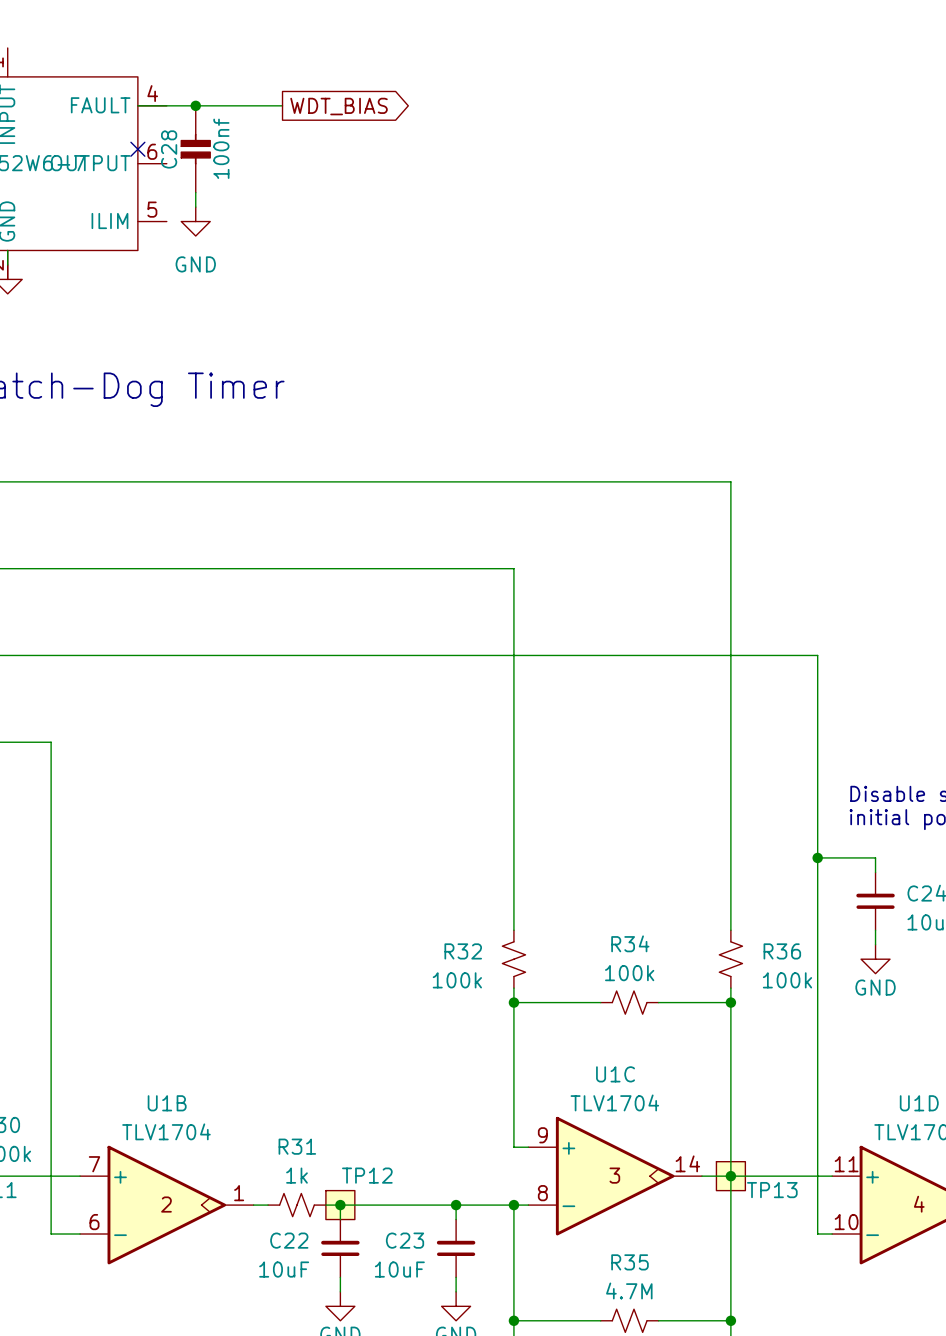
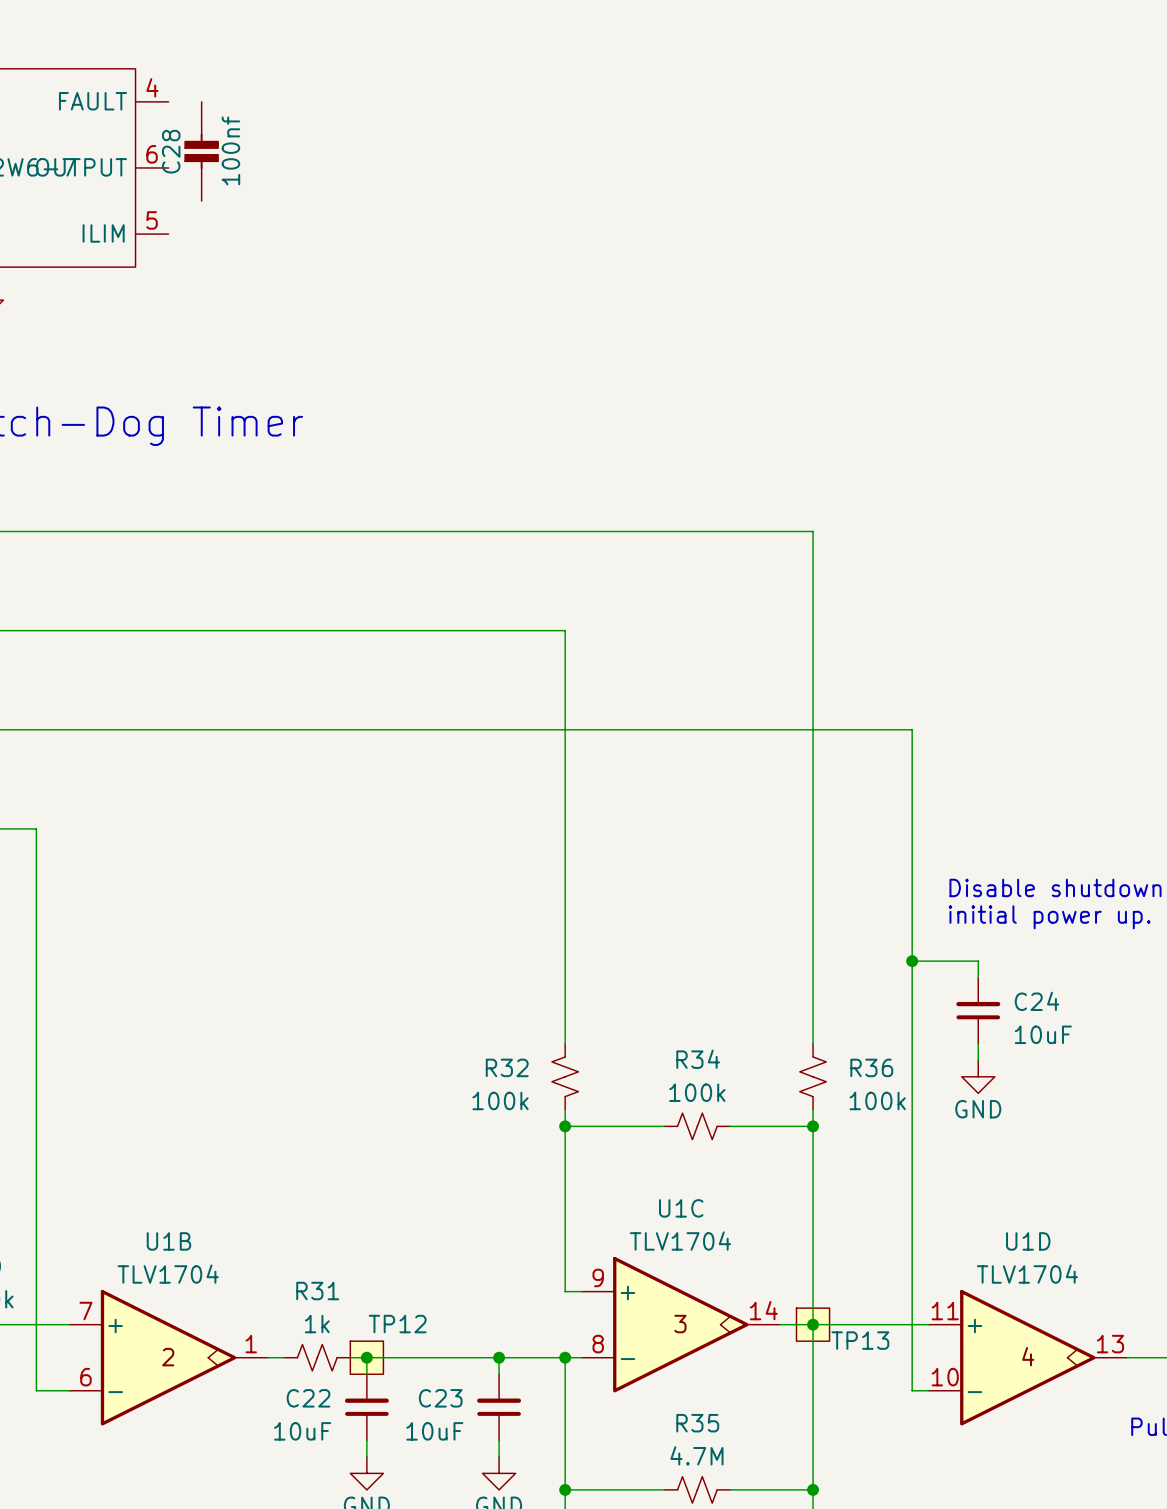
wire: (137, 105) (282, 105) -> none
junction: (195, 105) -> none
global label: WDT_BIAS (339, 106) -> none
no-connect mark: (137, 149) -> none
wire: (195, 192) (195, 207) -> none
power symbol: GND (195, 221) -> none

